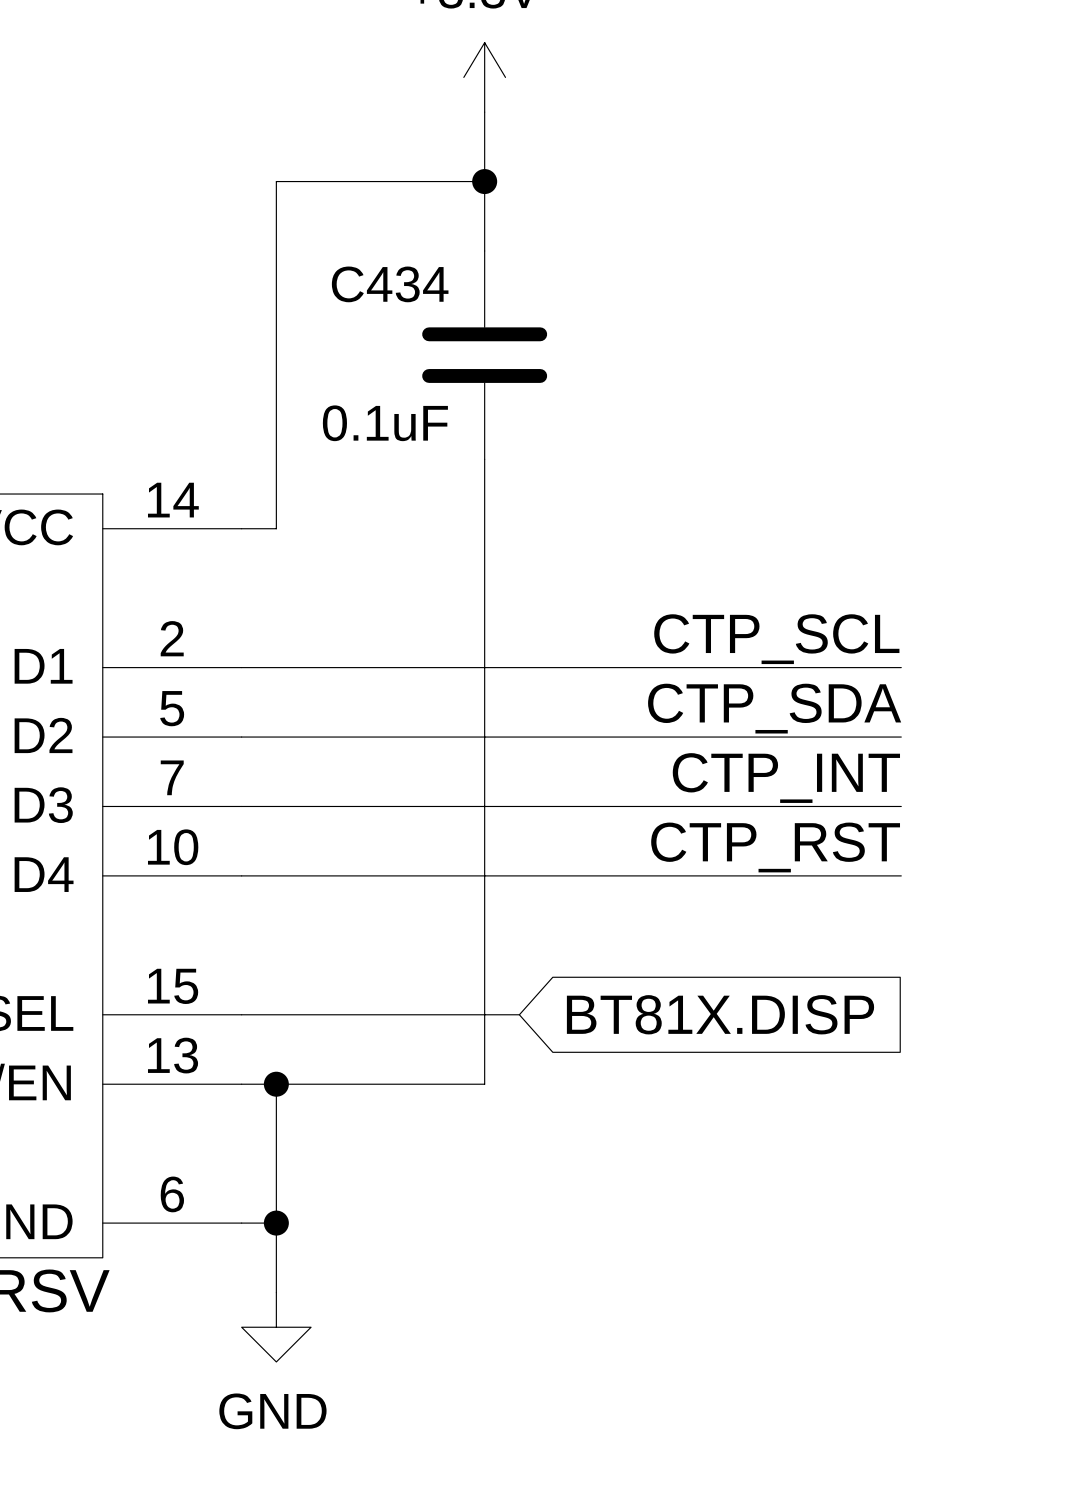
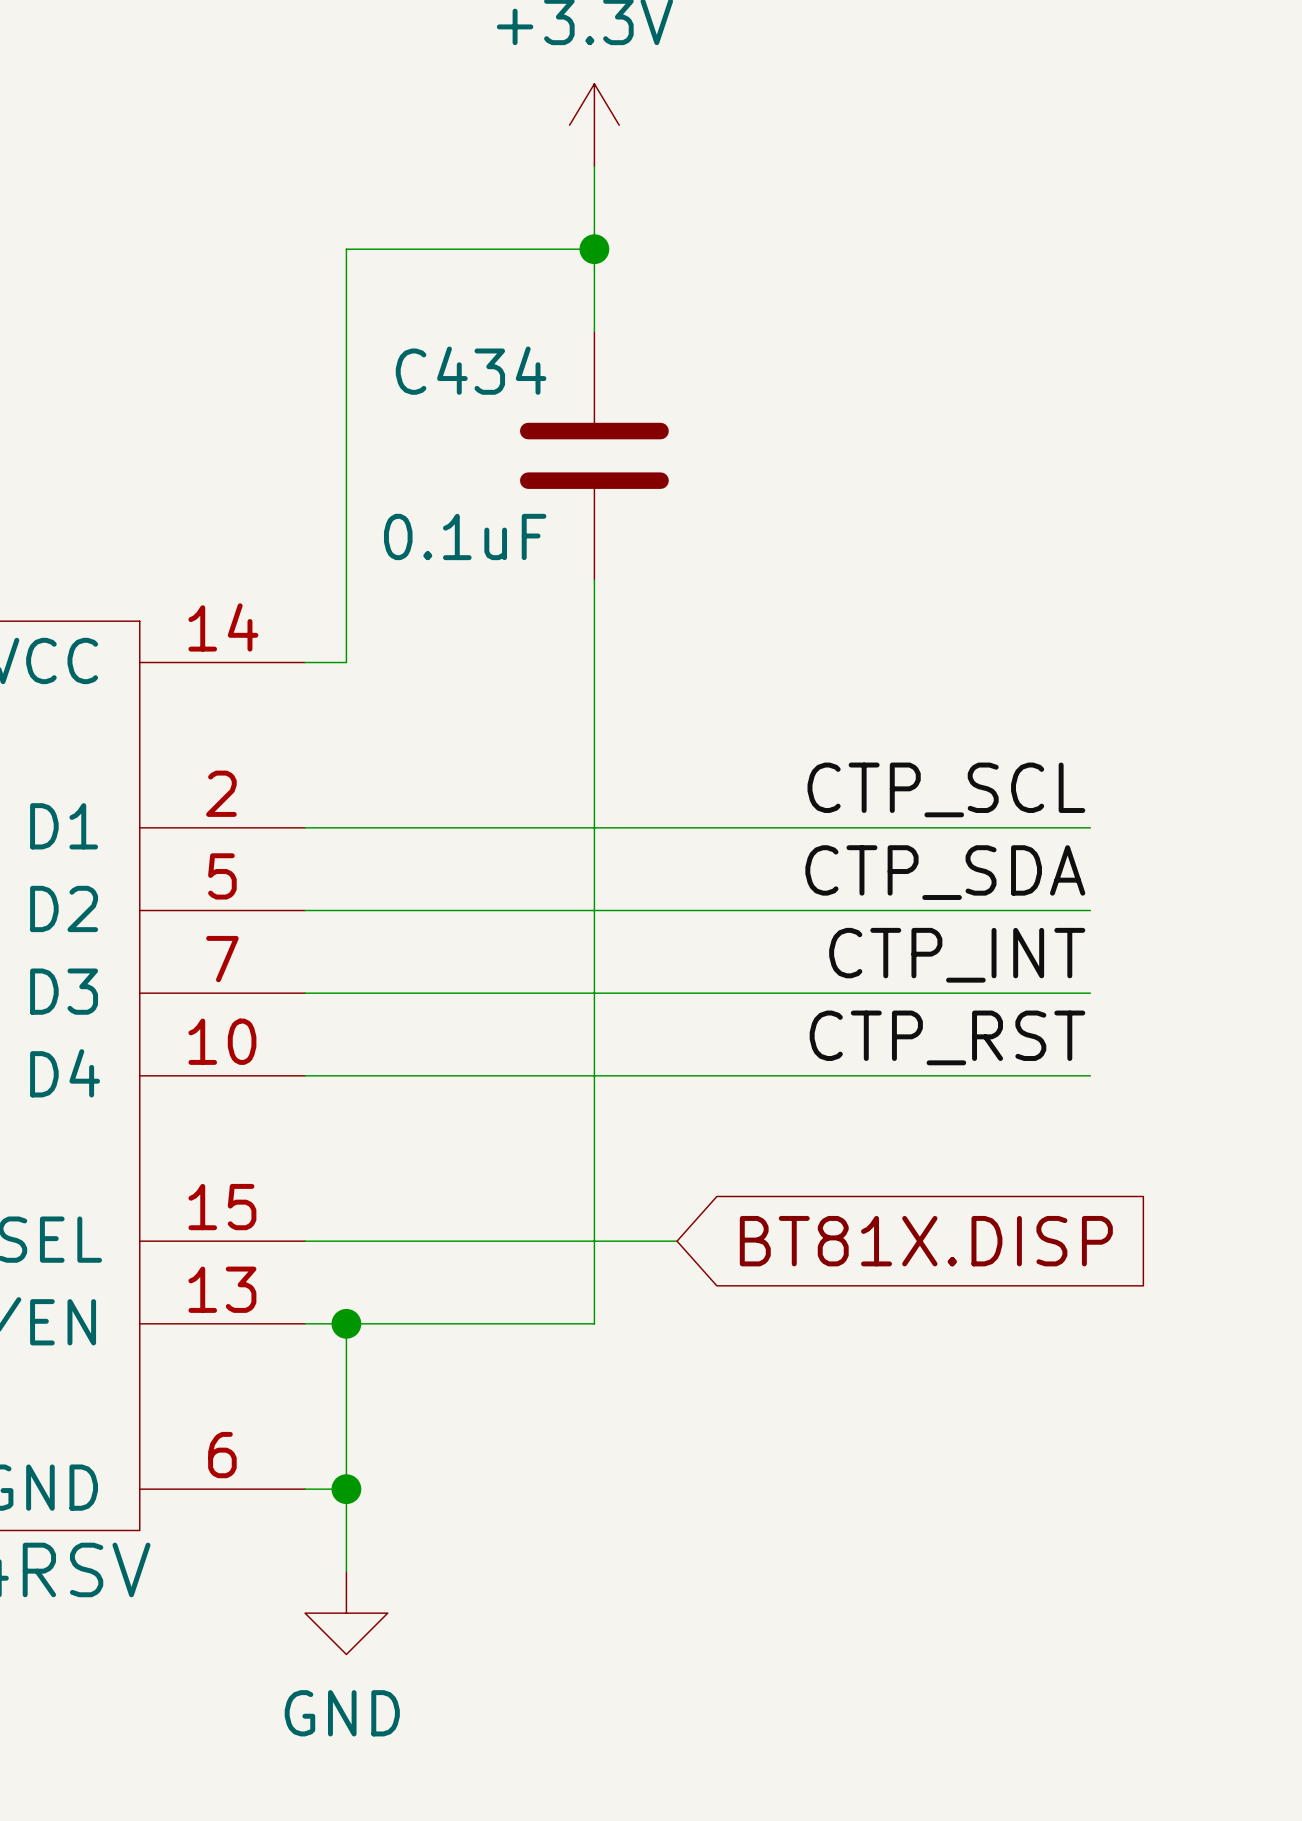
wire: none -> (635, 1241) (677, 1241)
global label position: BT81X.DISP (720, 1014) -> BT81X.DISP (926, 1241)

